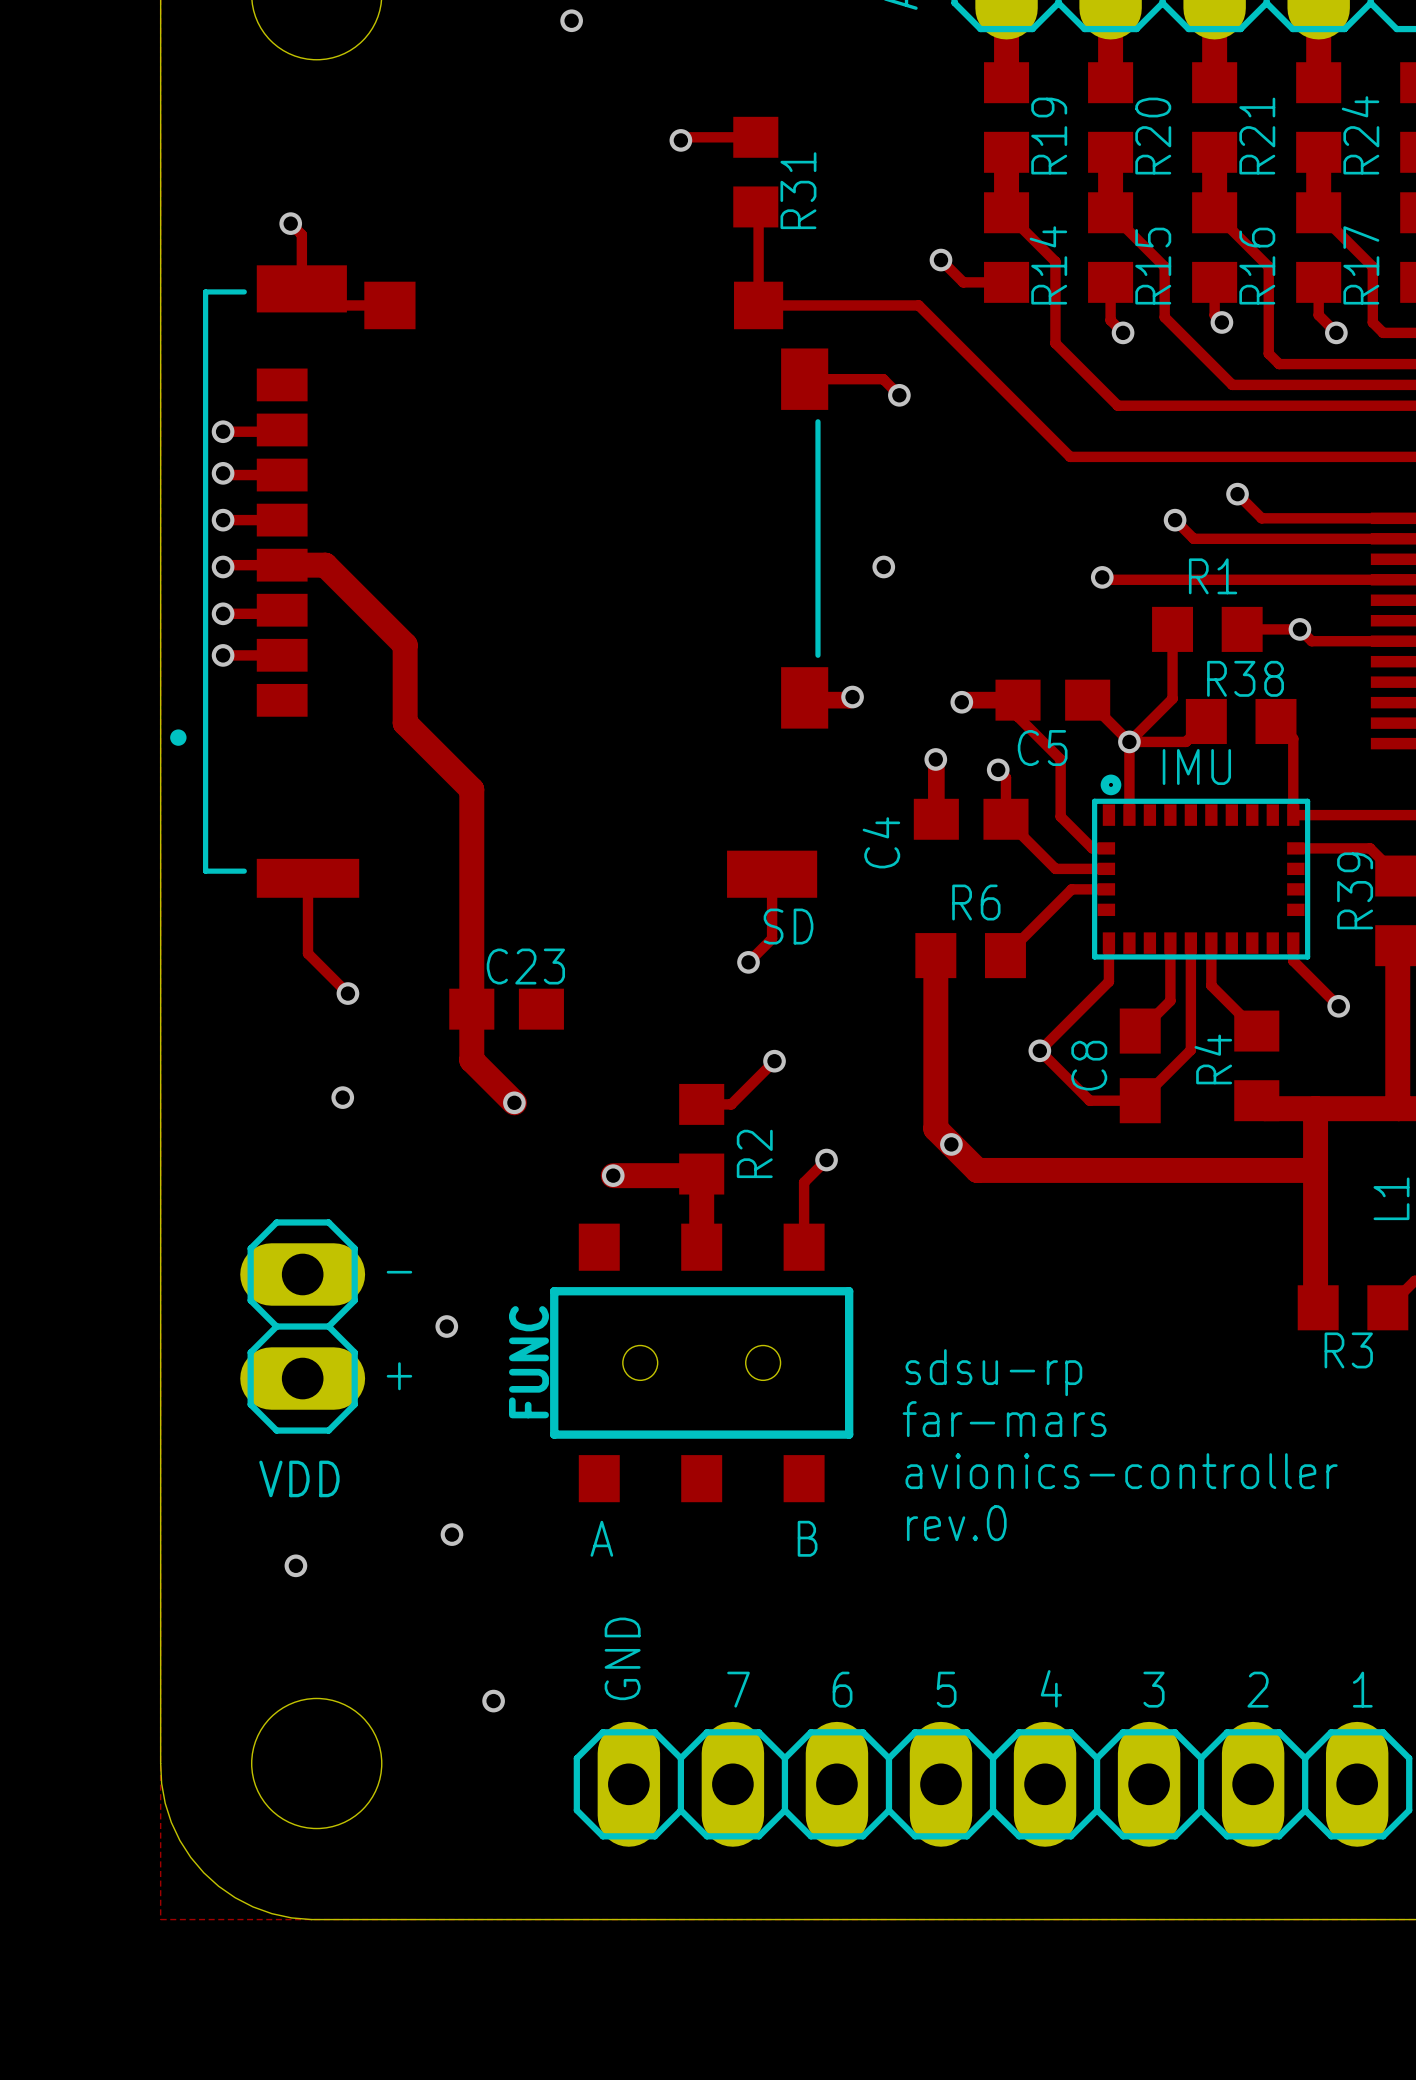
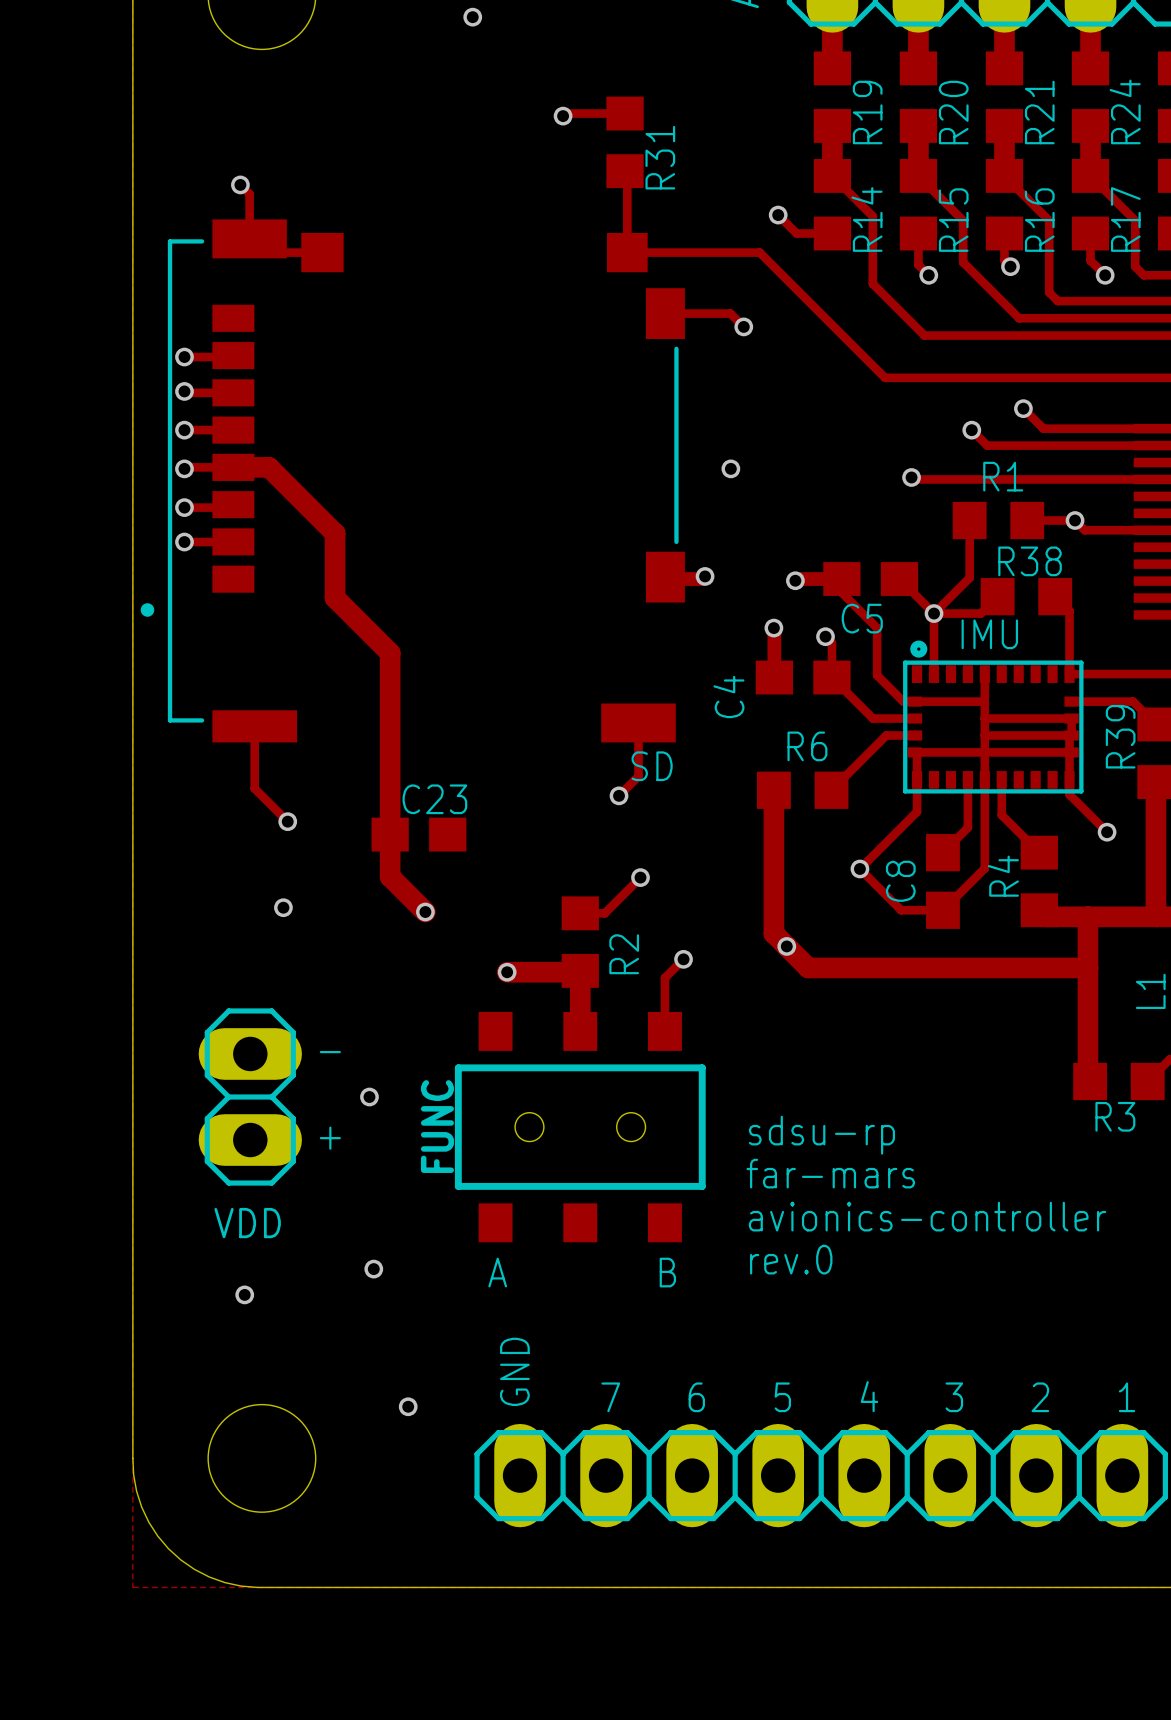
track: none -> (984, 674) (984, 779)
track: none -> (914, 701) (984, 701)
track: none -> (984, 718) (1071, 718) (1071, 735)
track: none -> (984, 735) (1071, 735)
track: none -> (1071, 735) (1069, 737) (1069, 779)
track: none -> (1069, 752) (914, 752) (917, 754) (917, 779)

